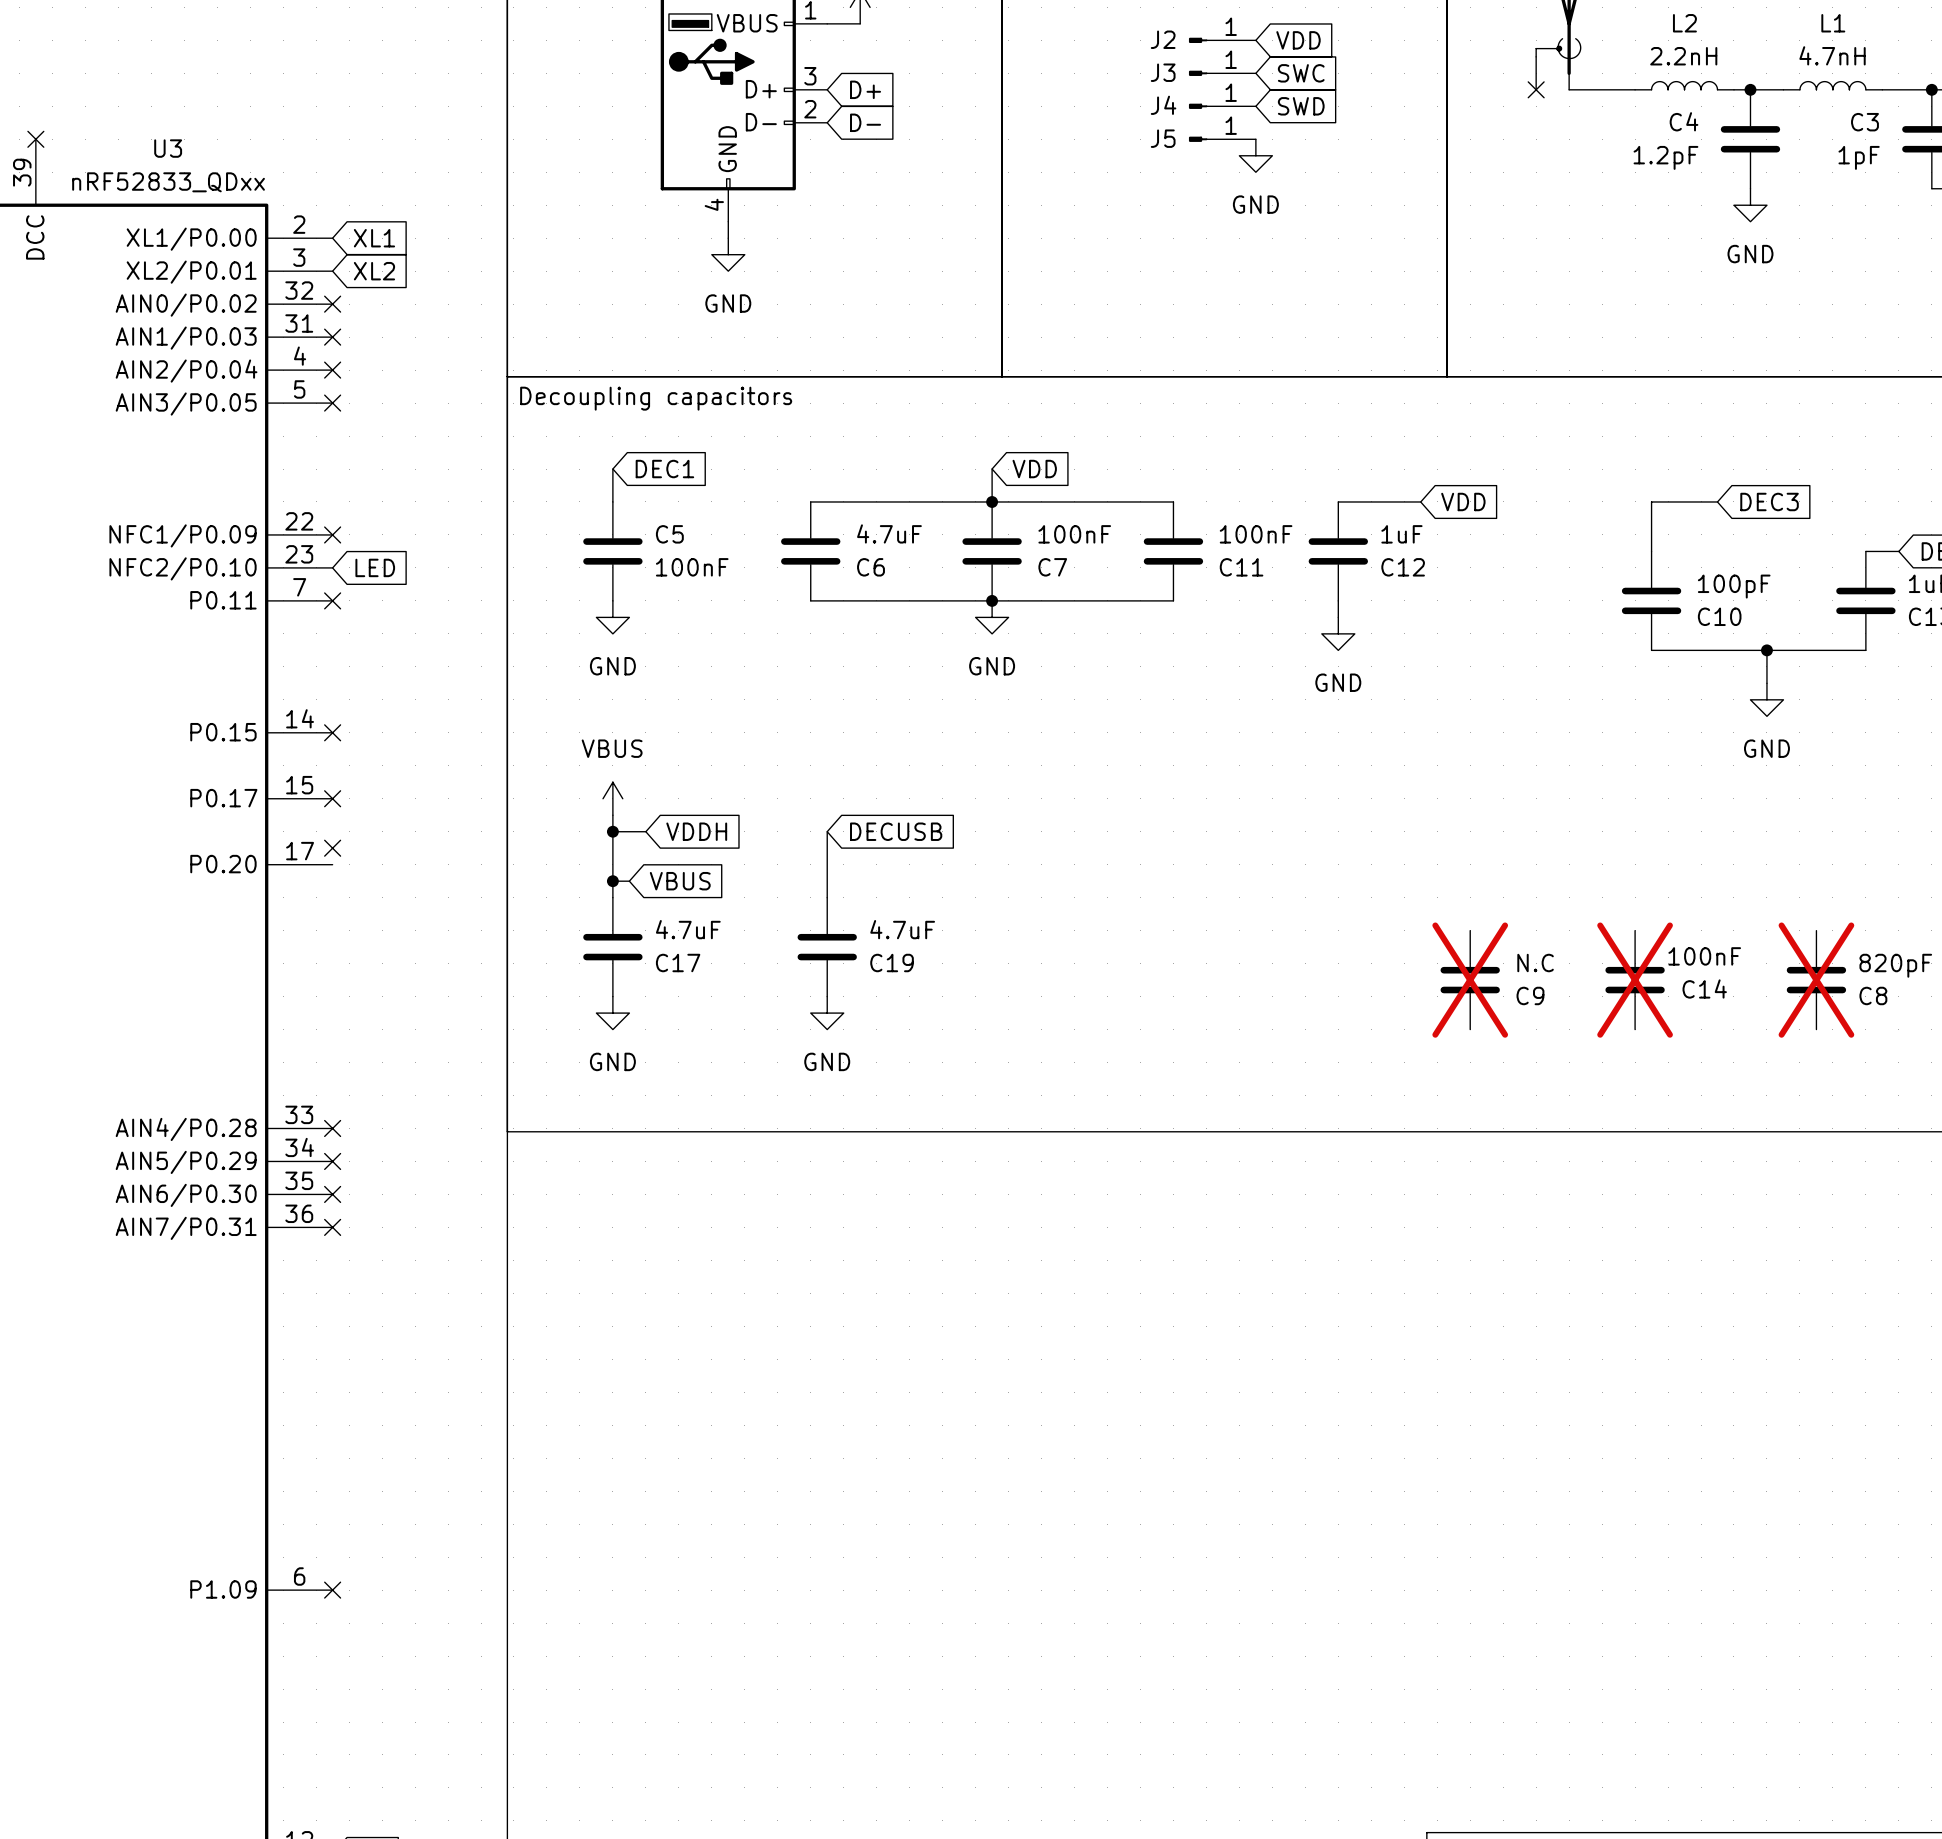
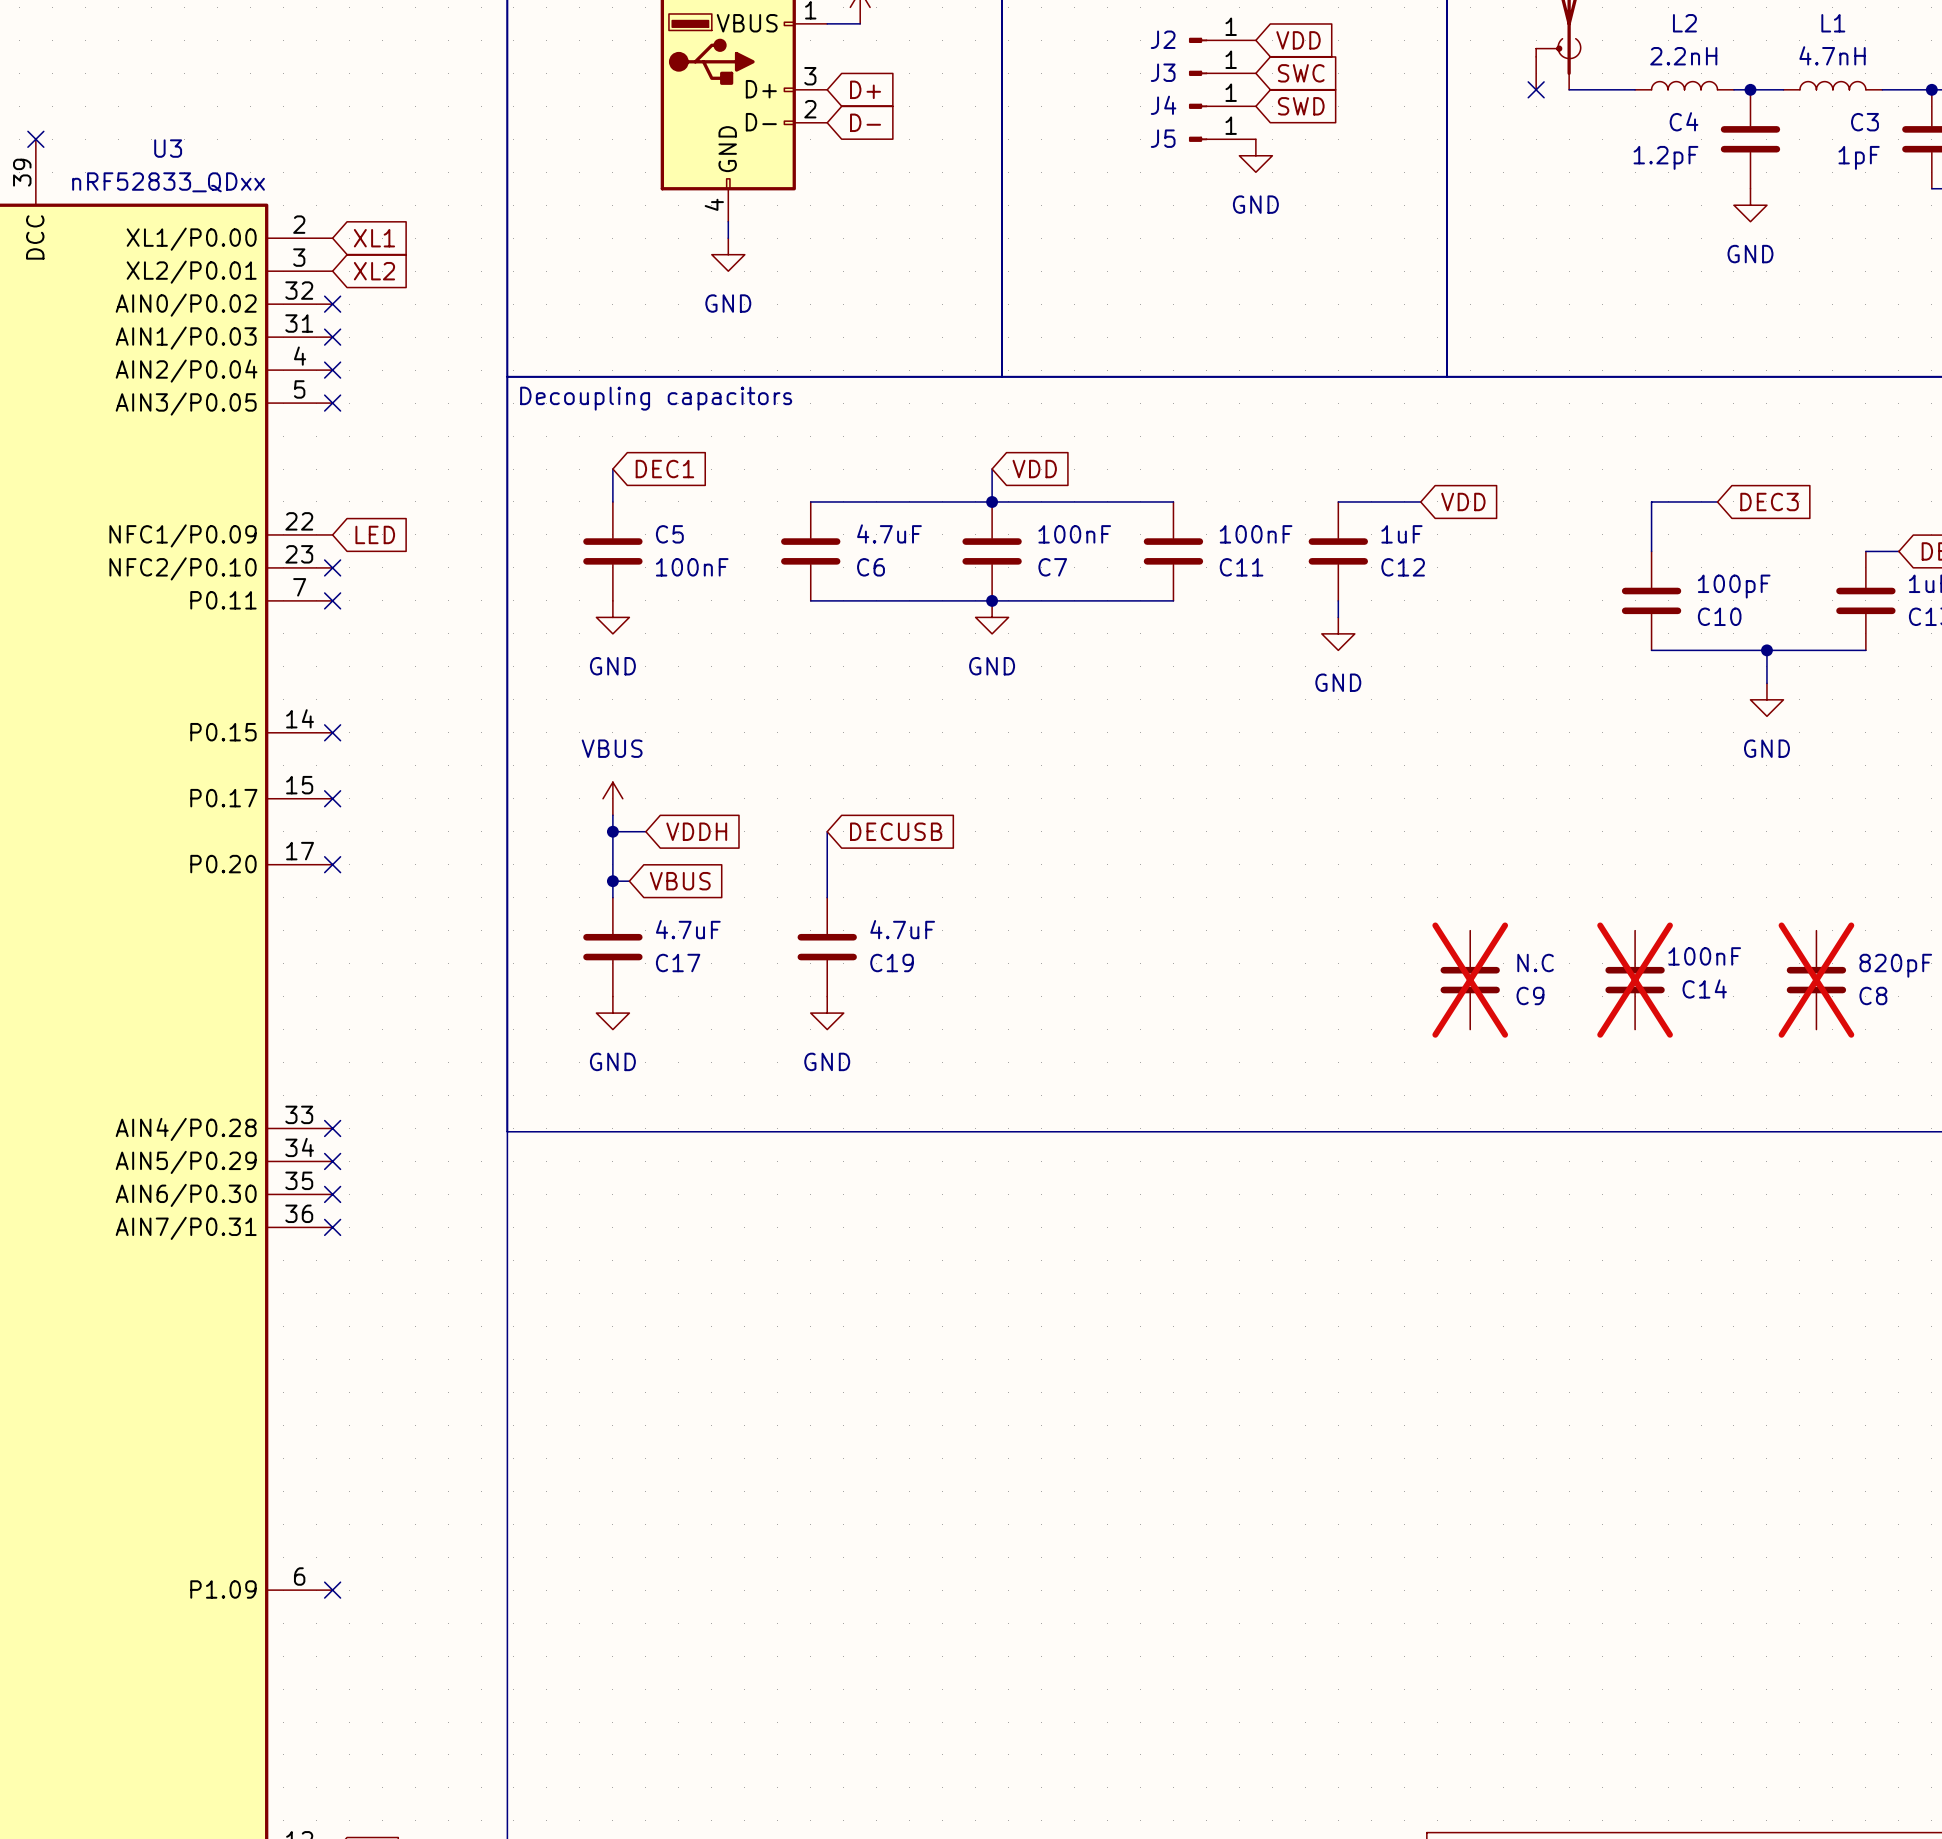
no-connect mark position: (332, 534) -> (332, 567)
global label position: LED (375, 567) -> LED (375, 534)
no-connect mark position: (332, 848) -> (332, 864)

